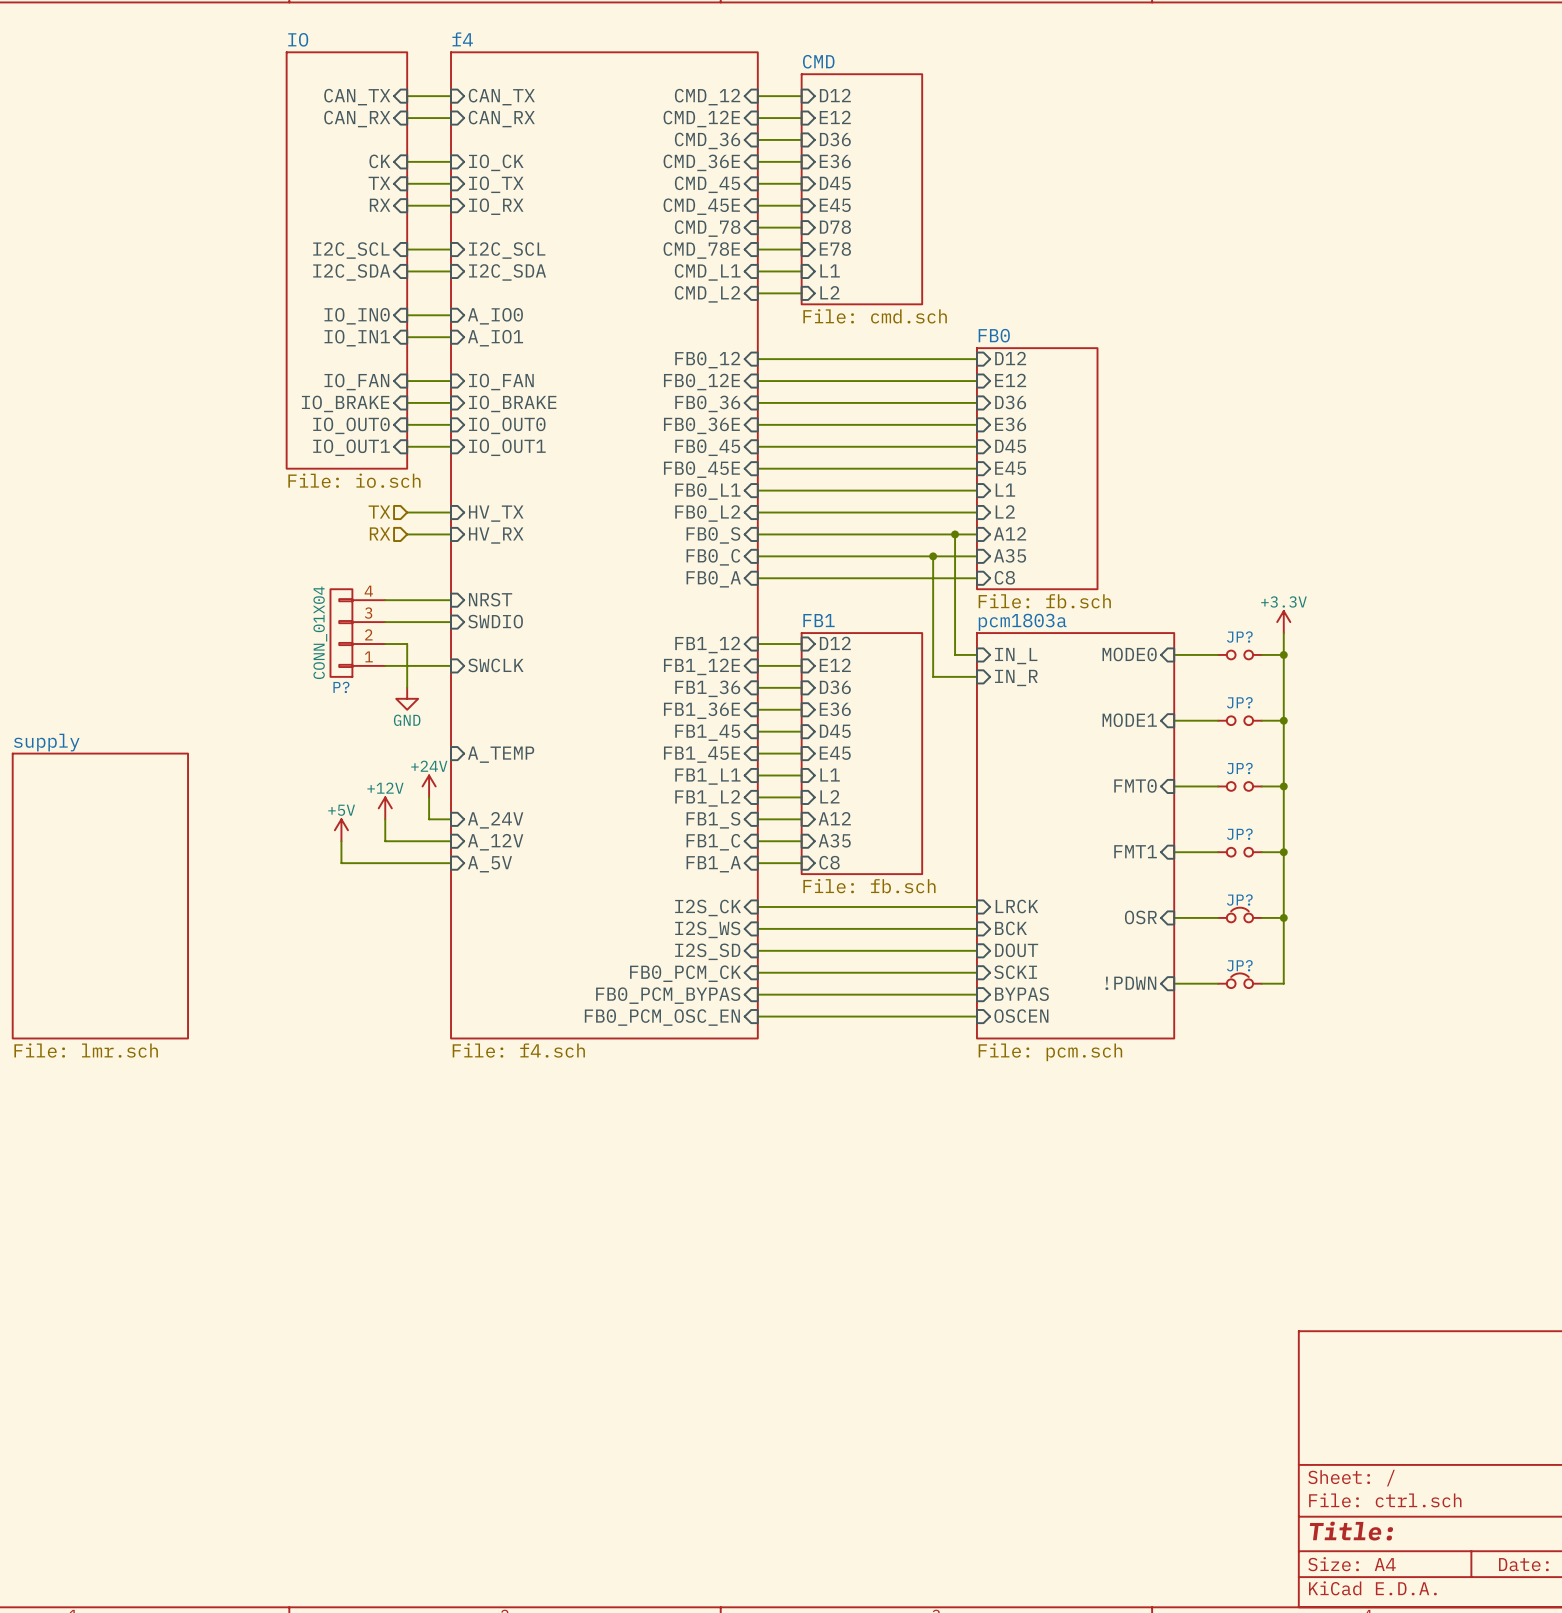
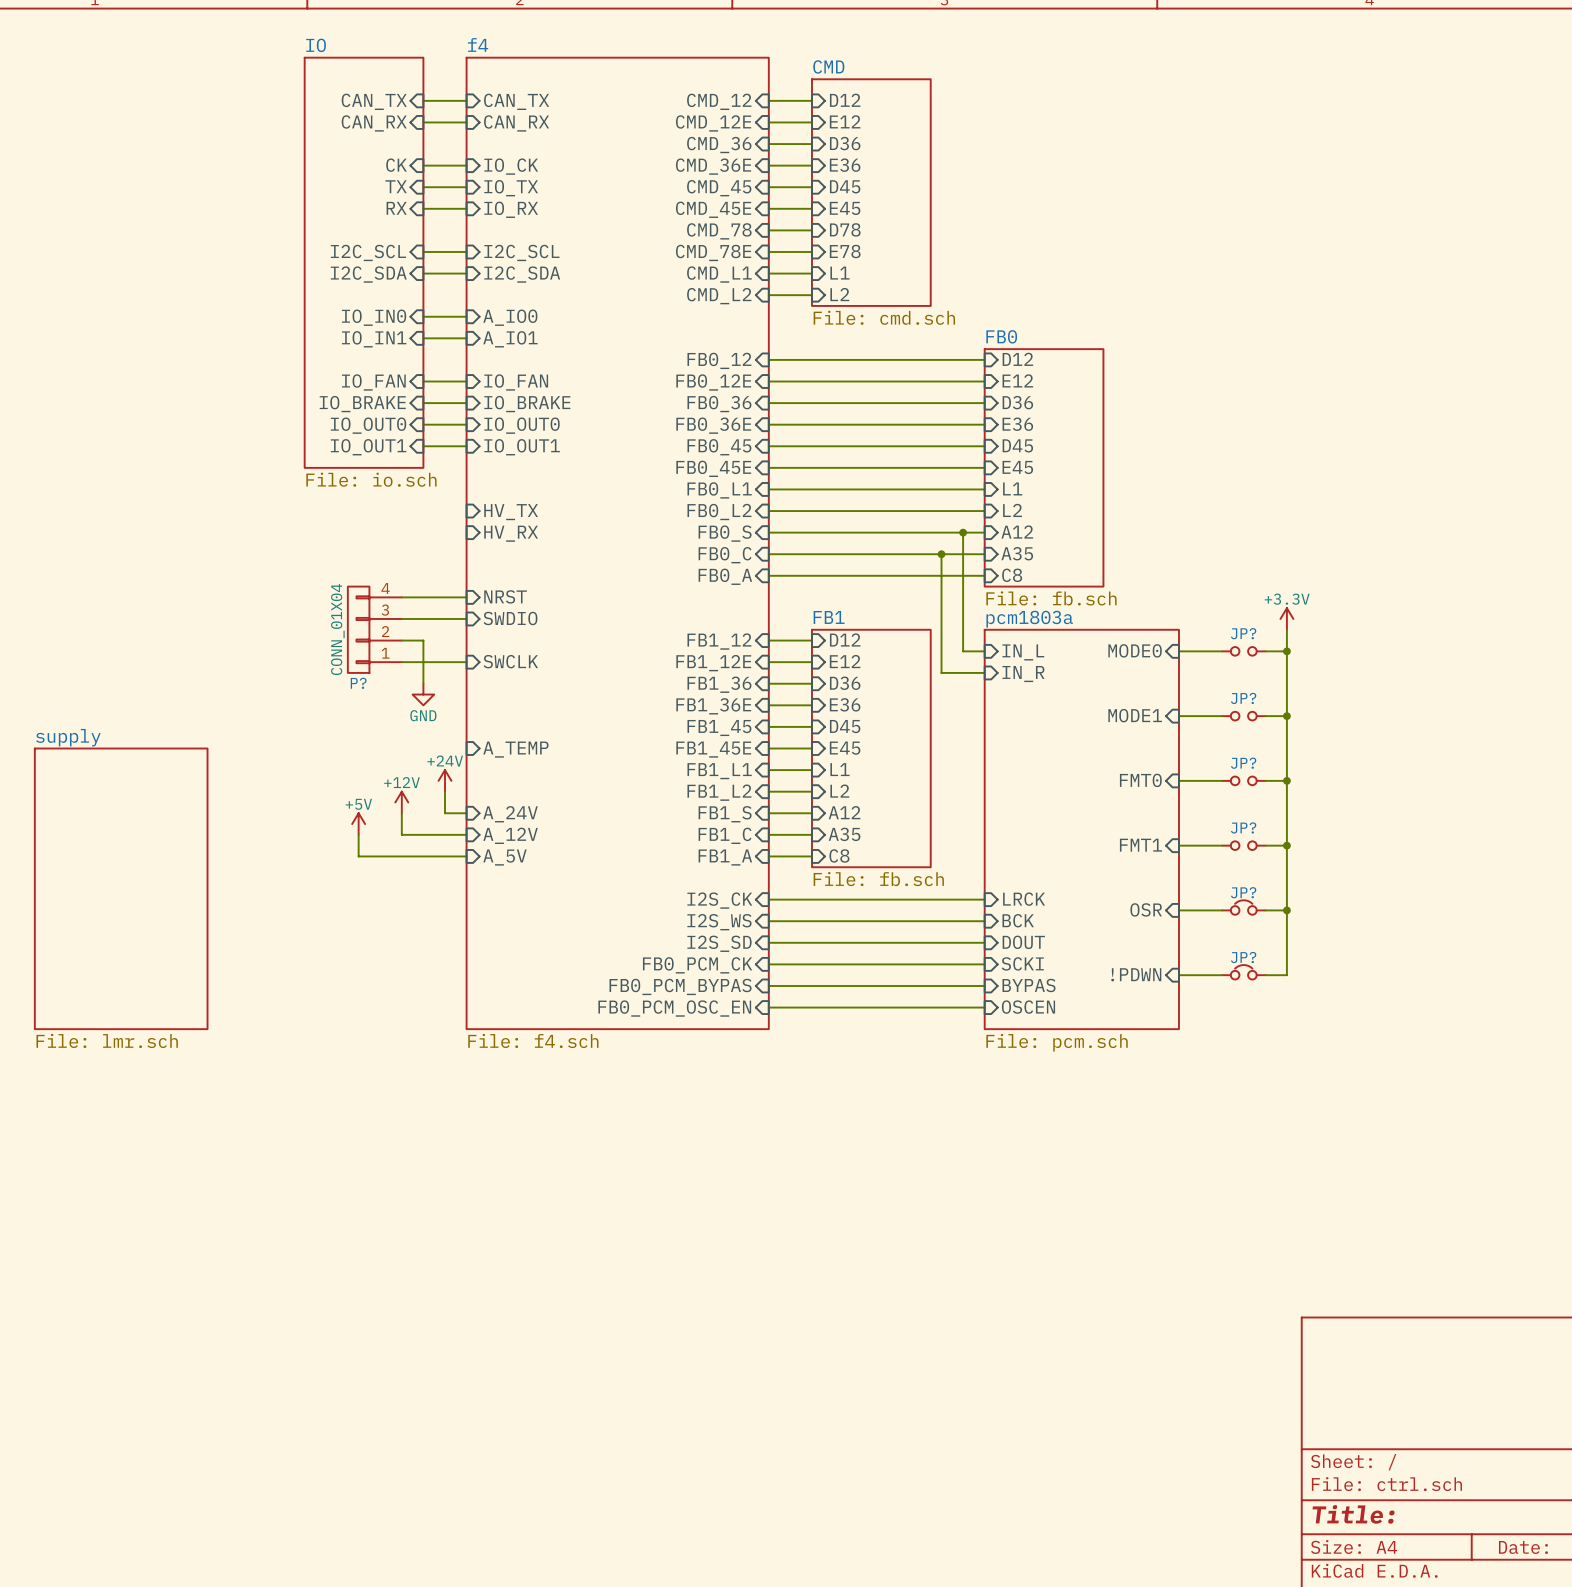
hierarchical label: TX (379, 512) -> none
wire: (407, 512) (451, 512) -> none
hierarchical label: RX (380, 533) -> none
wire: (407, 534) (451, 534) -> none

